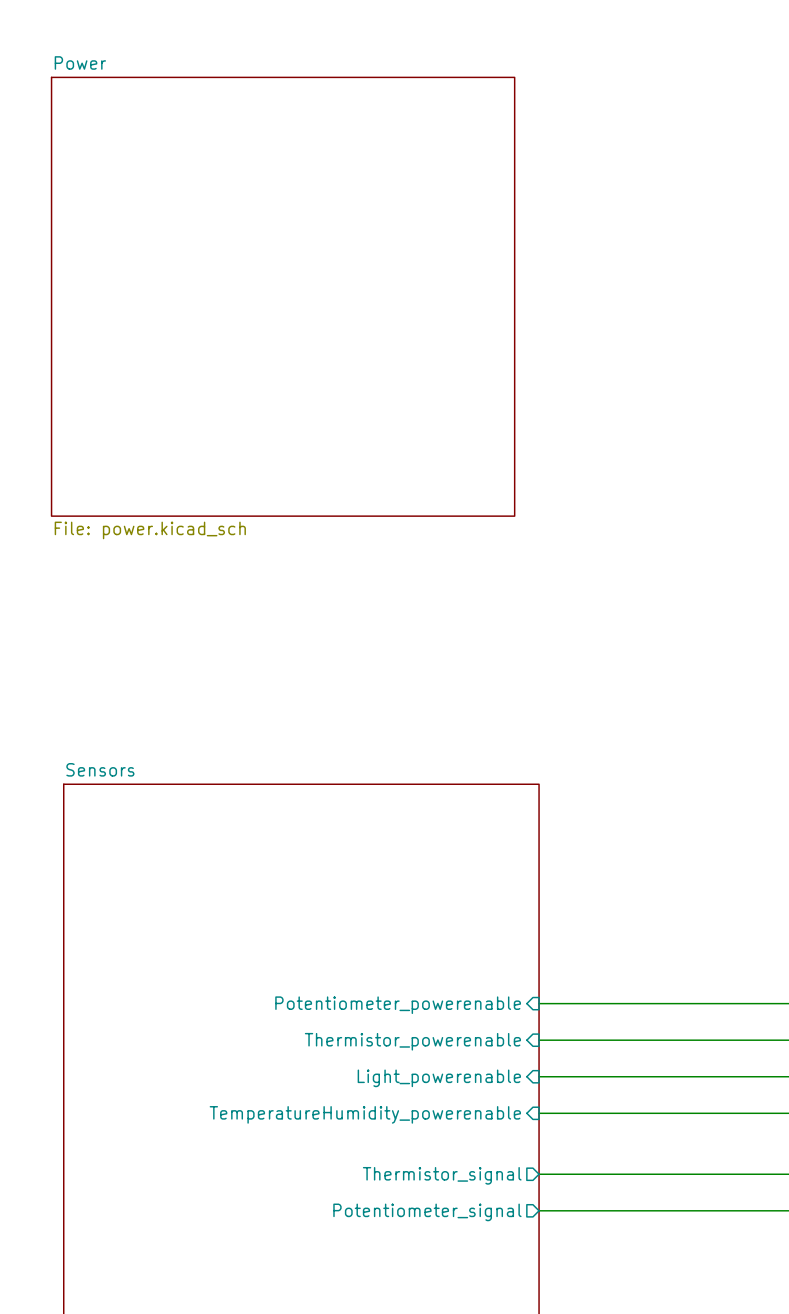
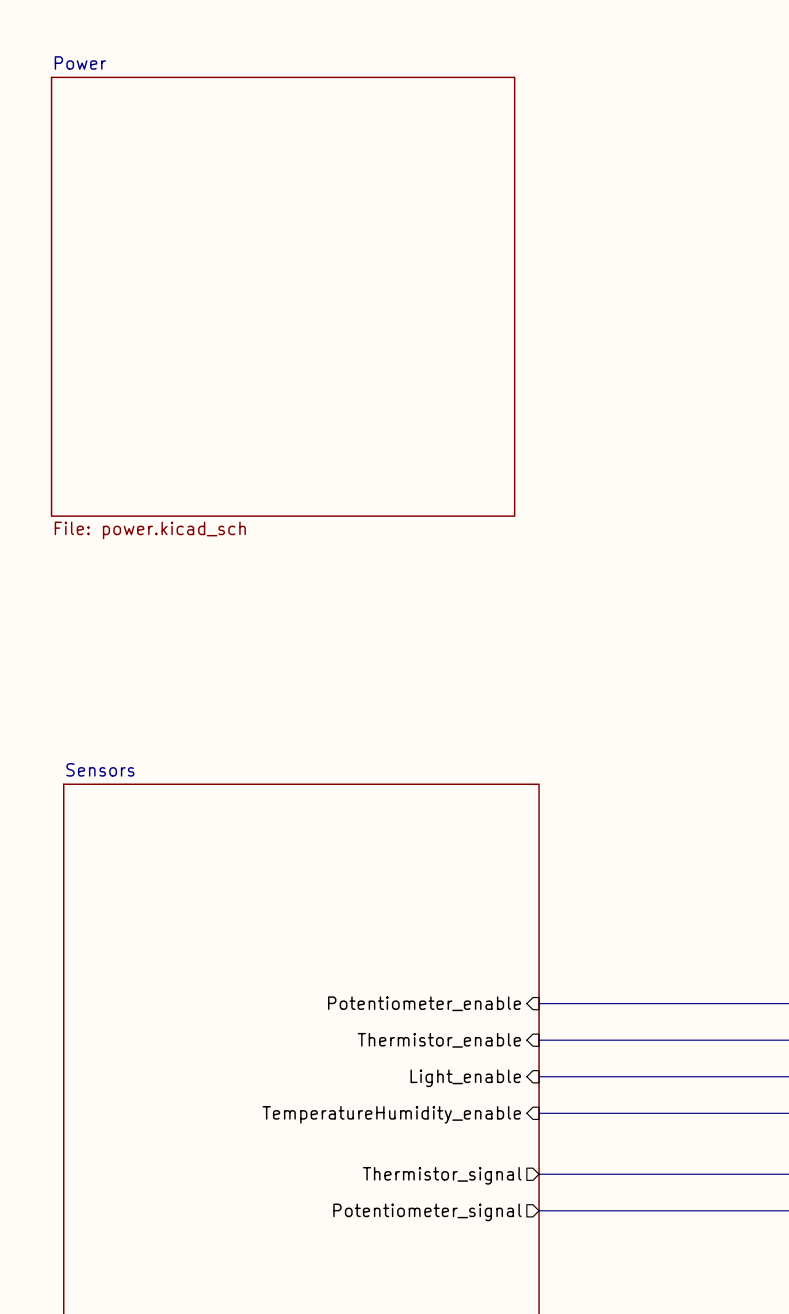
sheet pin: Potentiometer_powerenable (398, 1005) -> Potentiometer_enable (424, 1003)
sheet pin: Thermistor_powerenable (412, 1041) -> Thermistor_enable (439, 1040)
sheet pin: Light_powerenable (439, 1078) -> Light_enable (465, 1078)
sheet pin: TemperatureHumidity_powerenable (365, 1114) -> TemperatureHumidity_enable (391, 1114)

